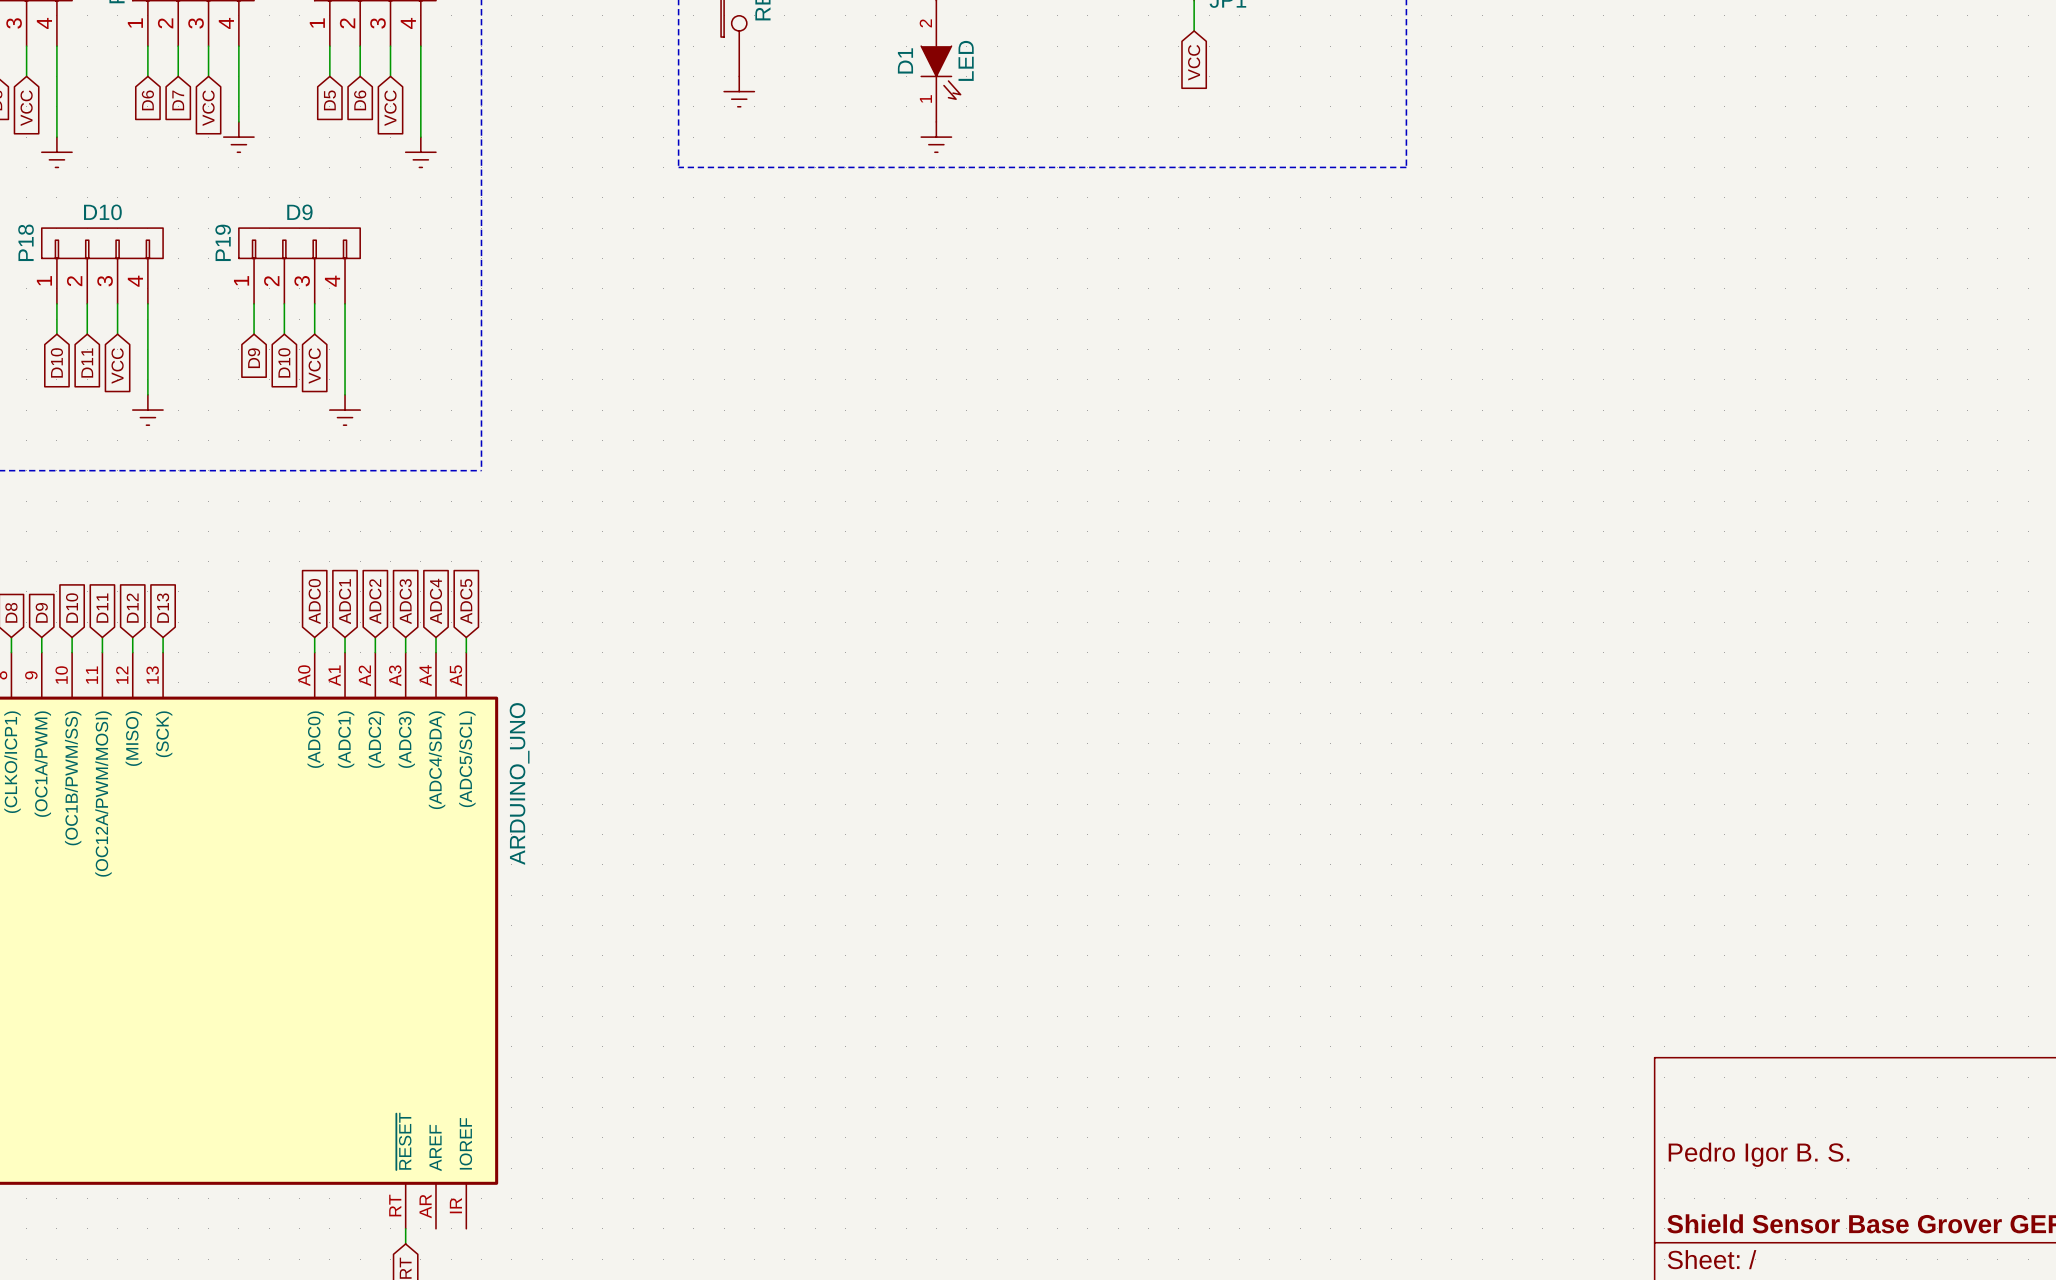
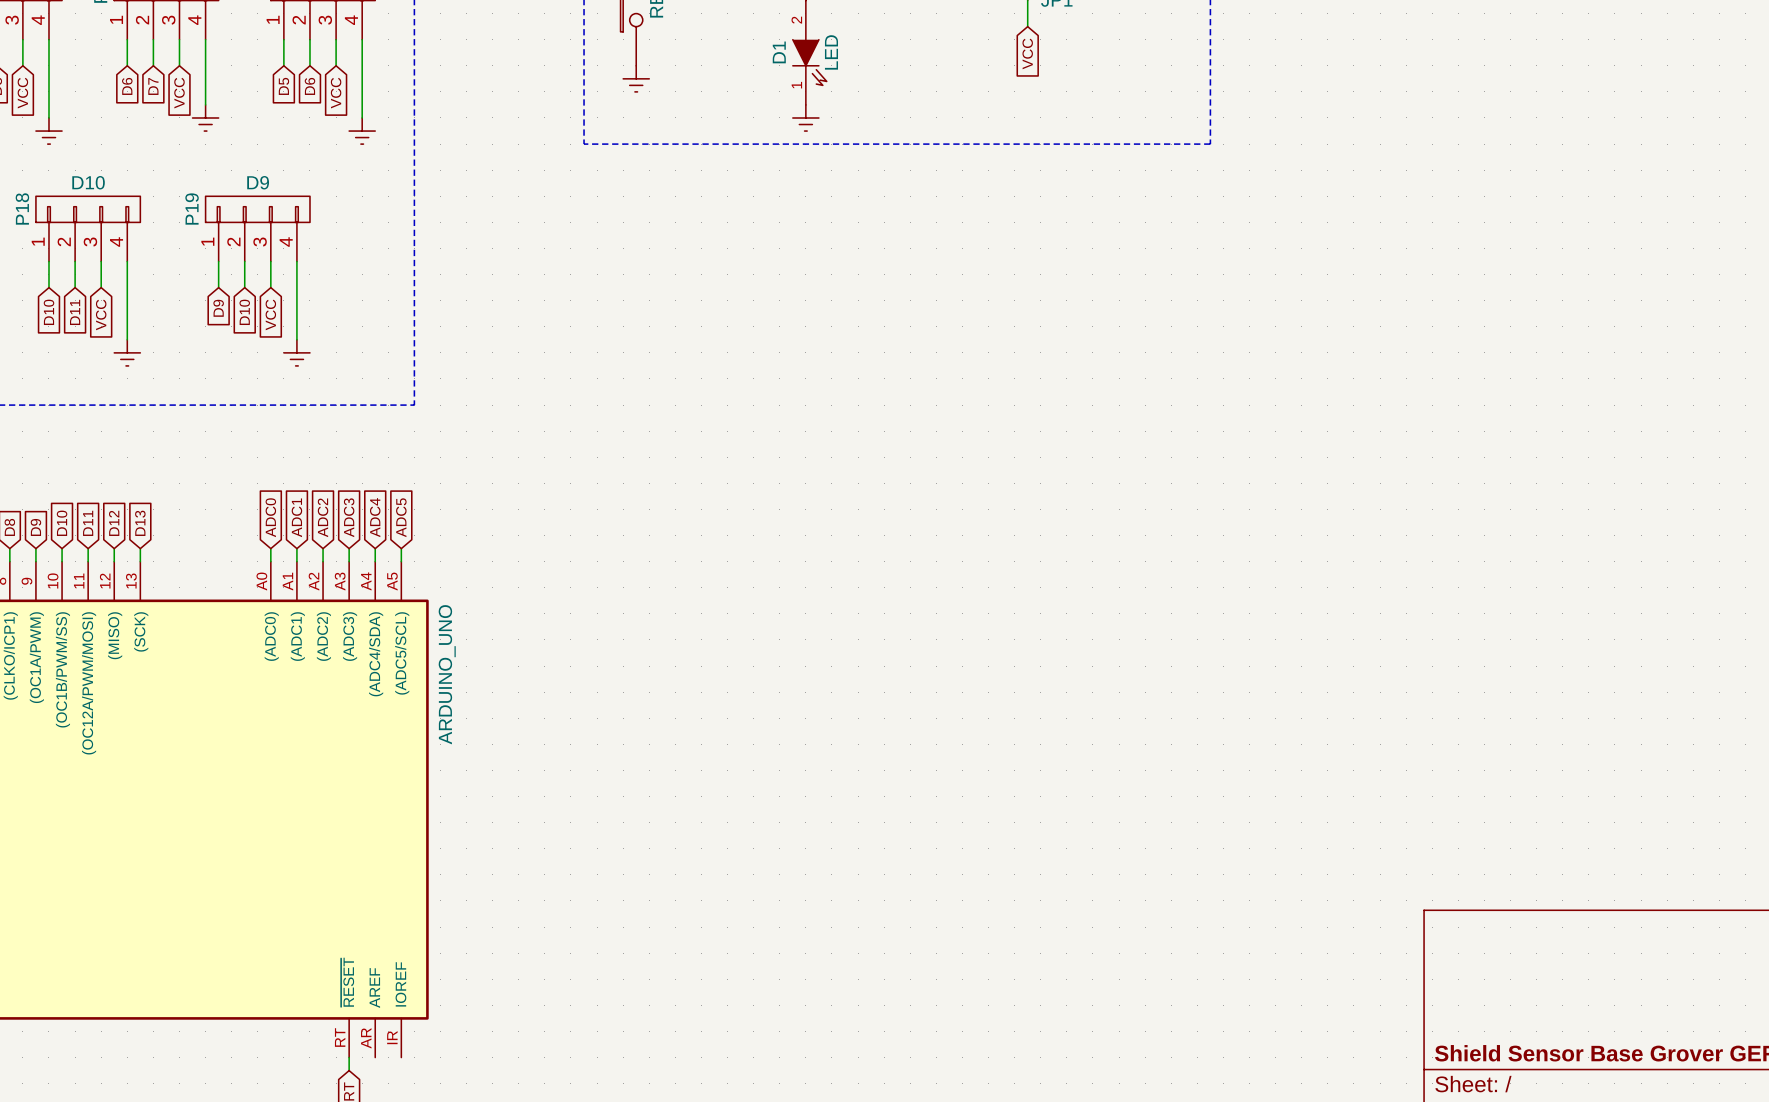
title block: Pedro Igor B. S. (1759, 1154) -> none

